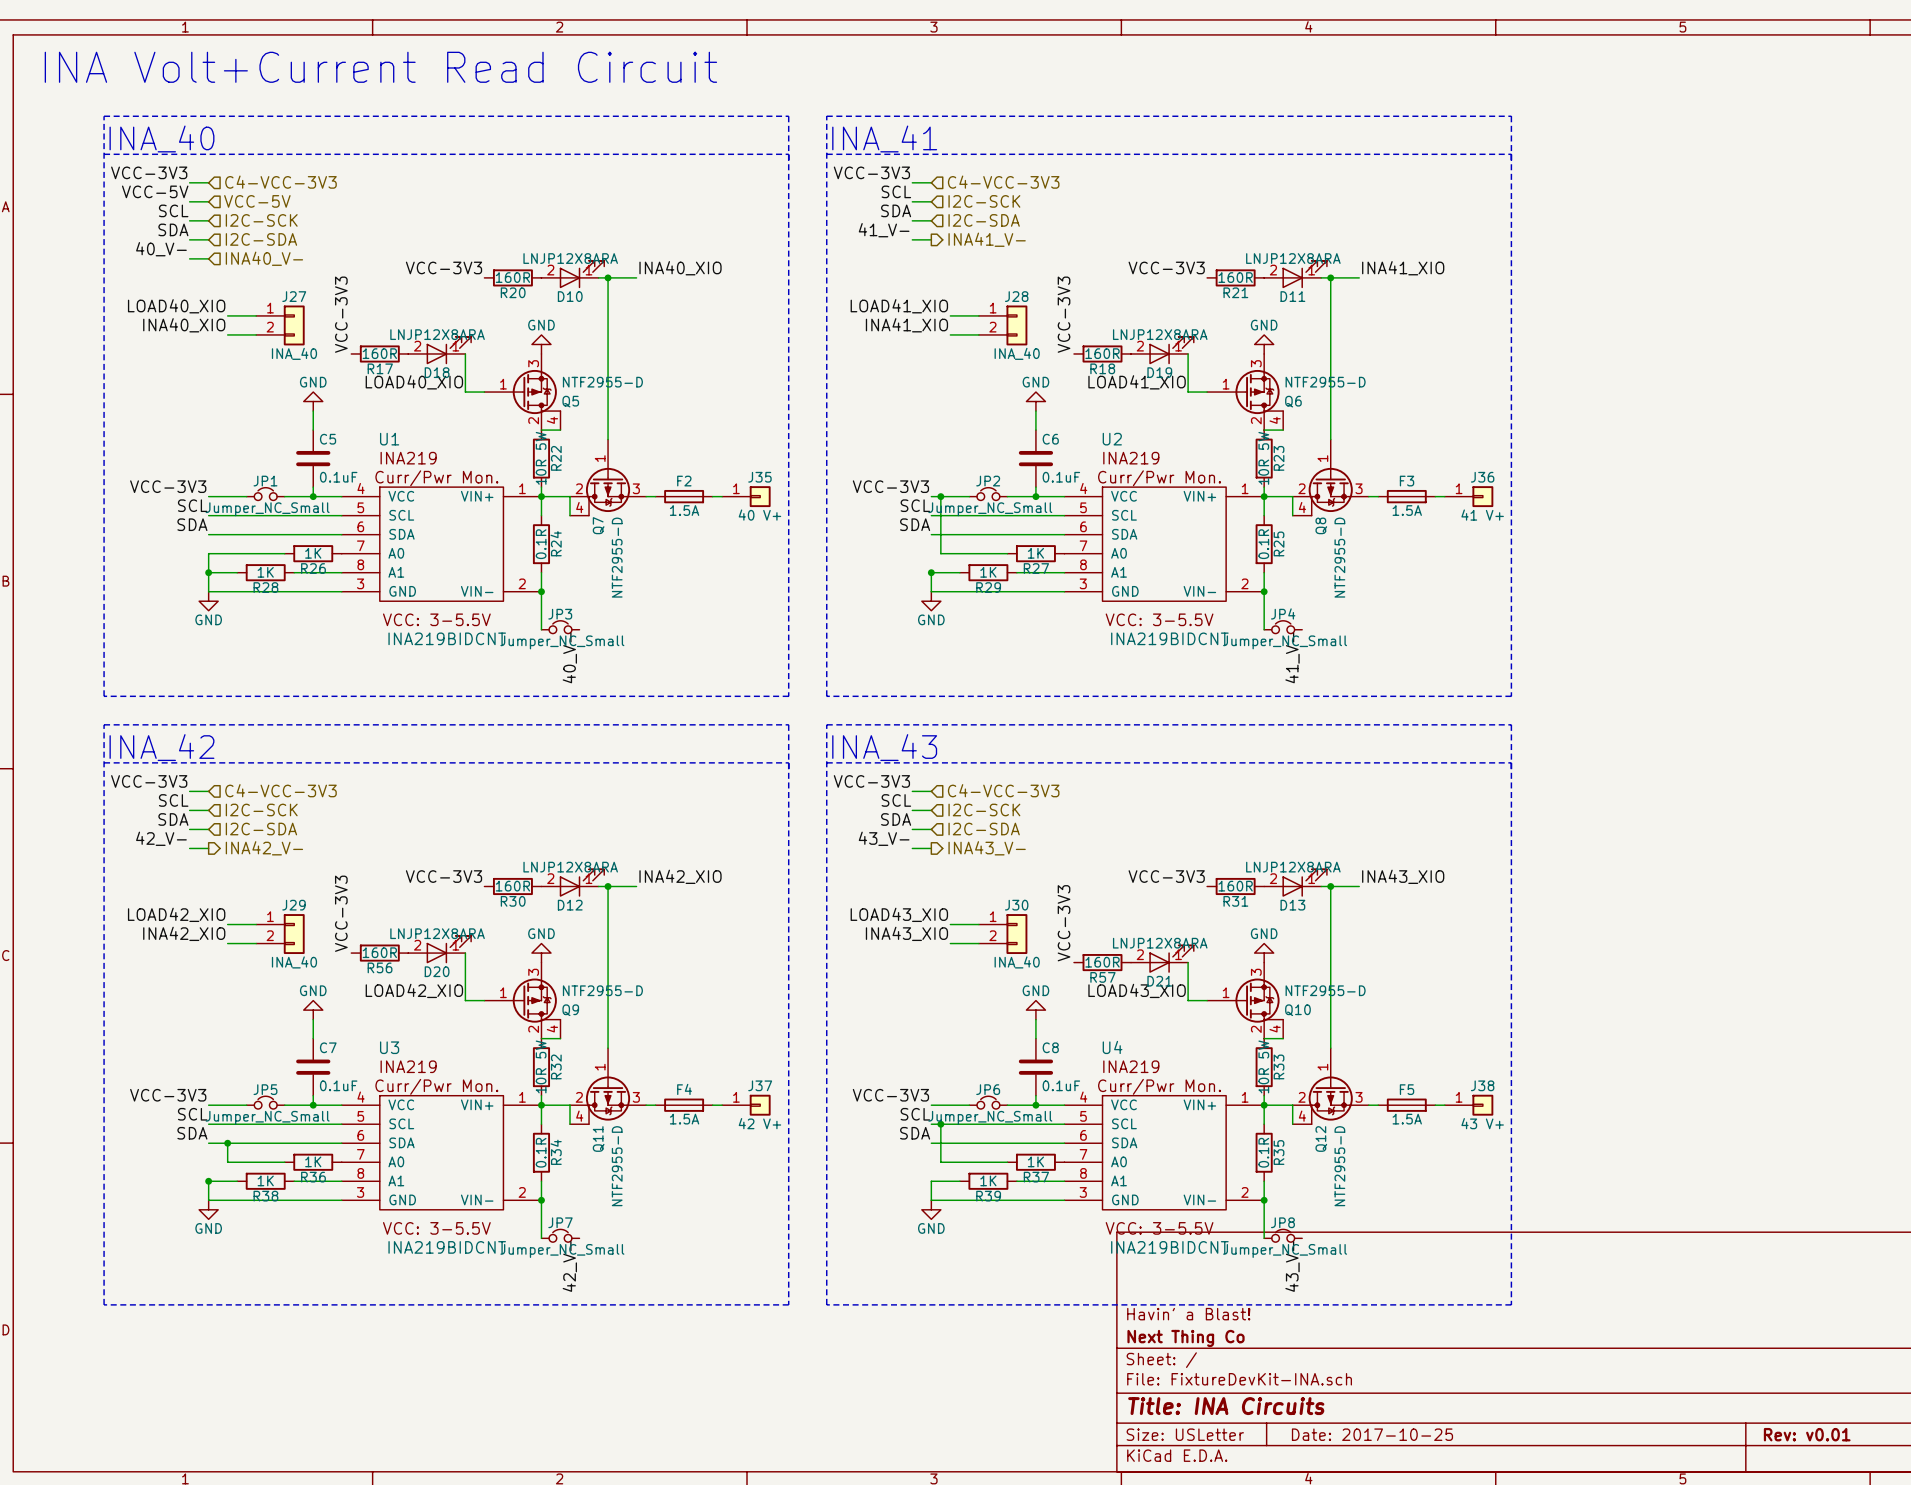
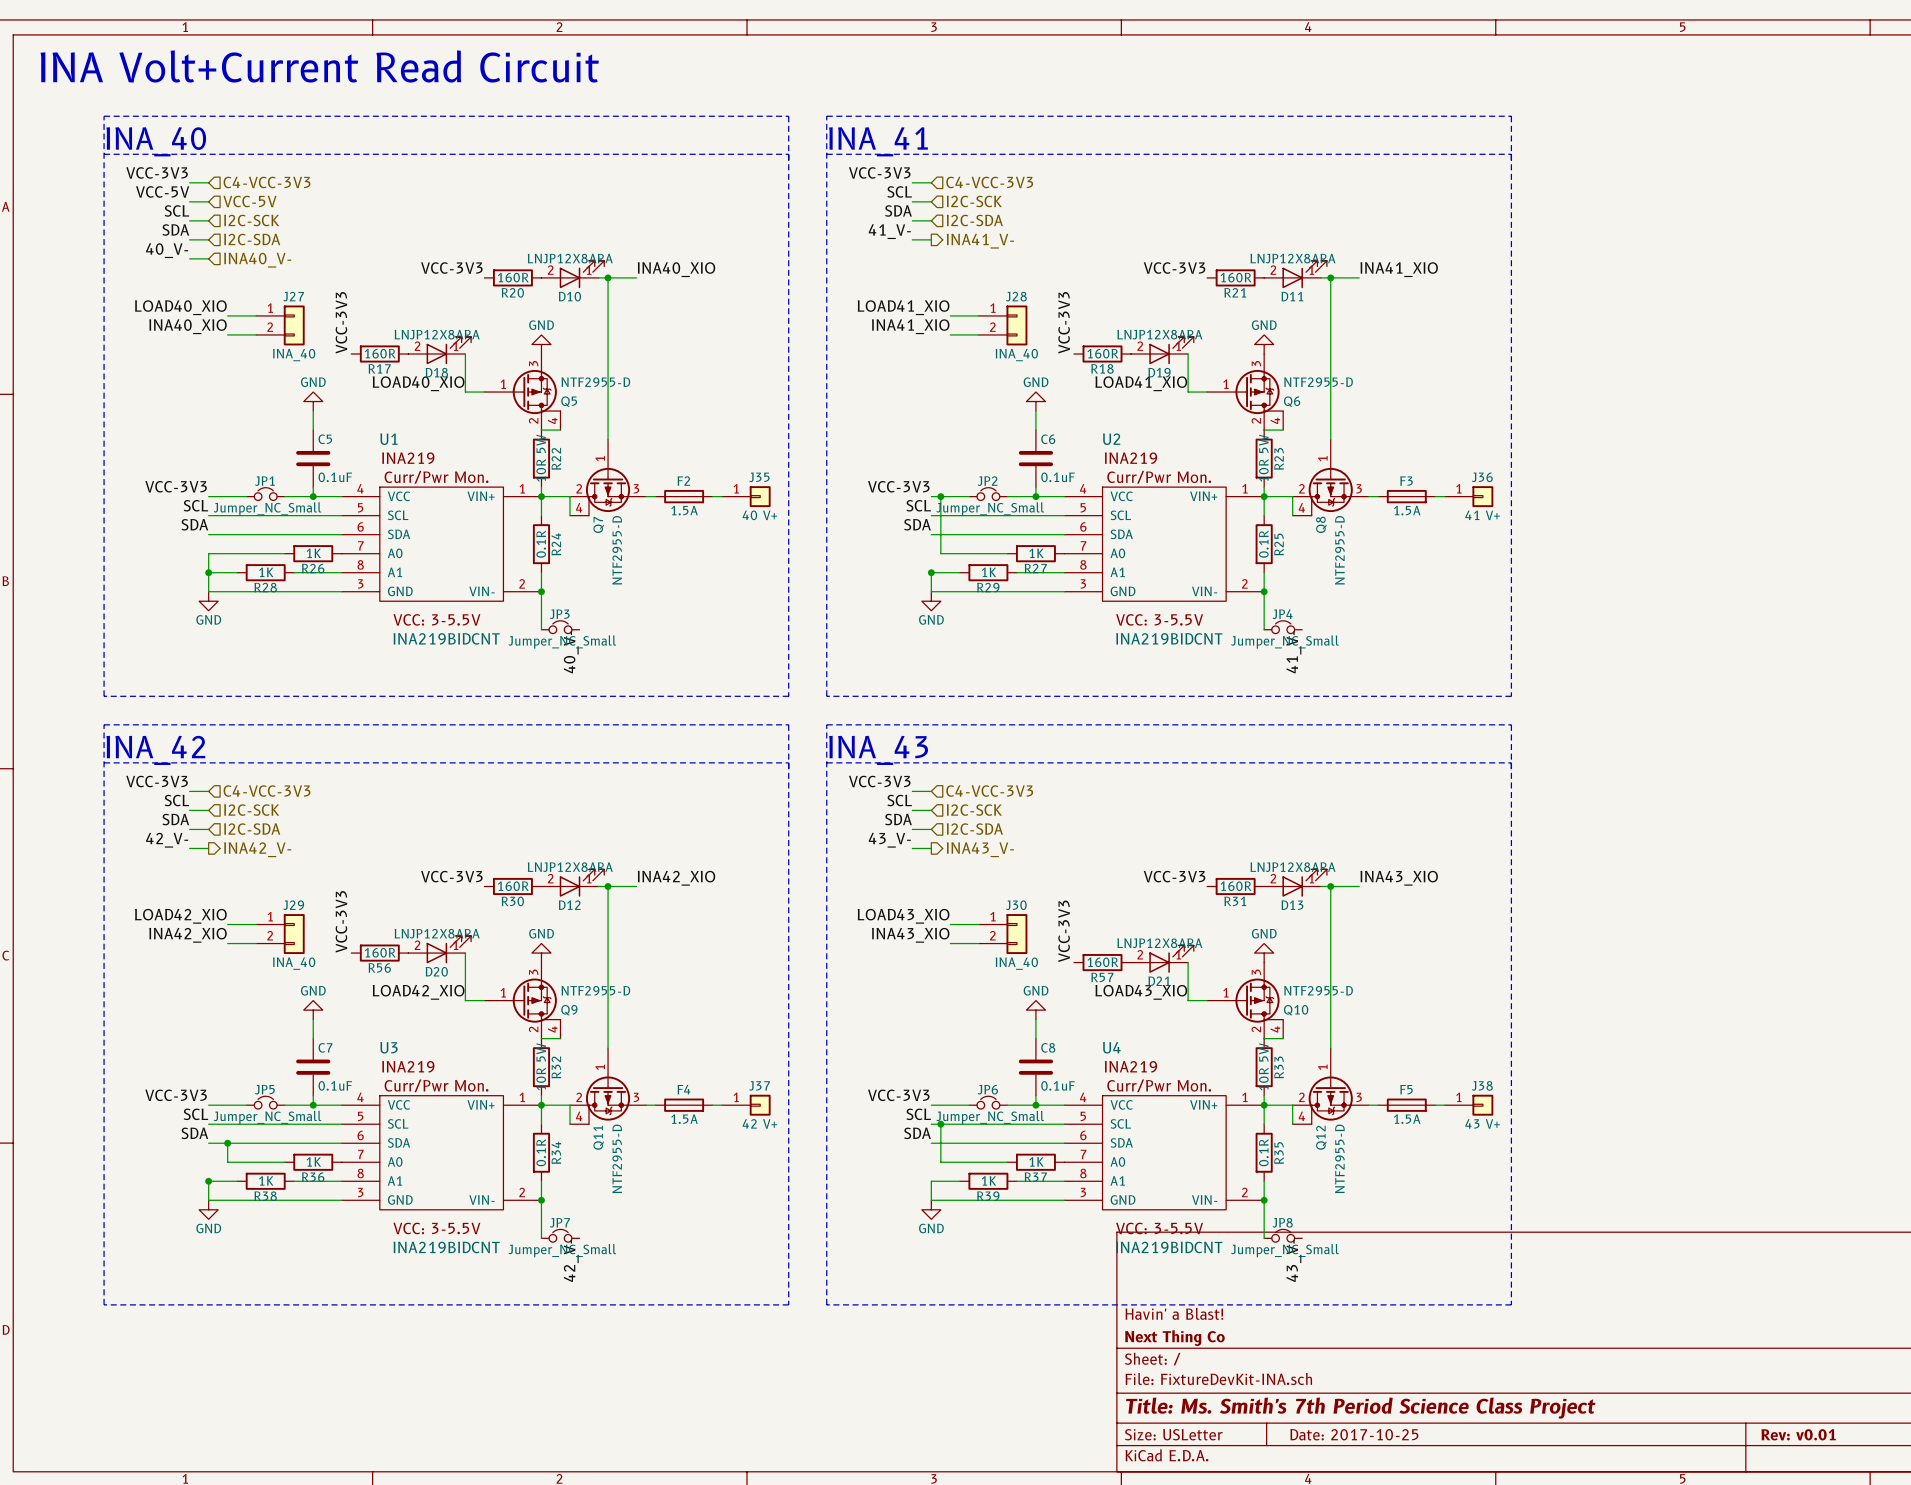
title block: Title: INA Circuits (1226, 1406) -> Title: Ms. Smith's 7th Period Science Class Project (1360, 1408)

